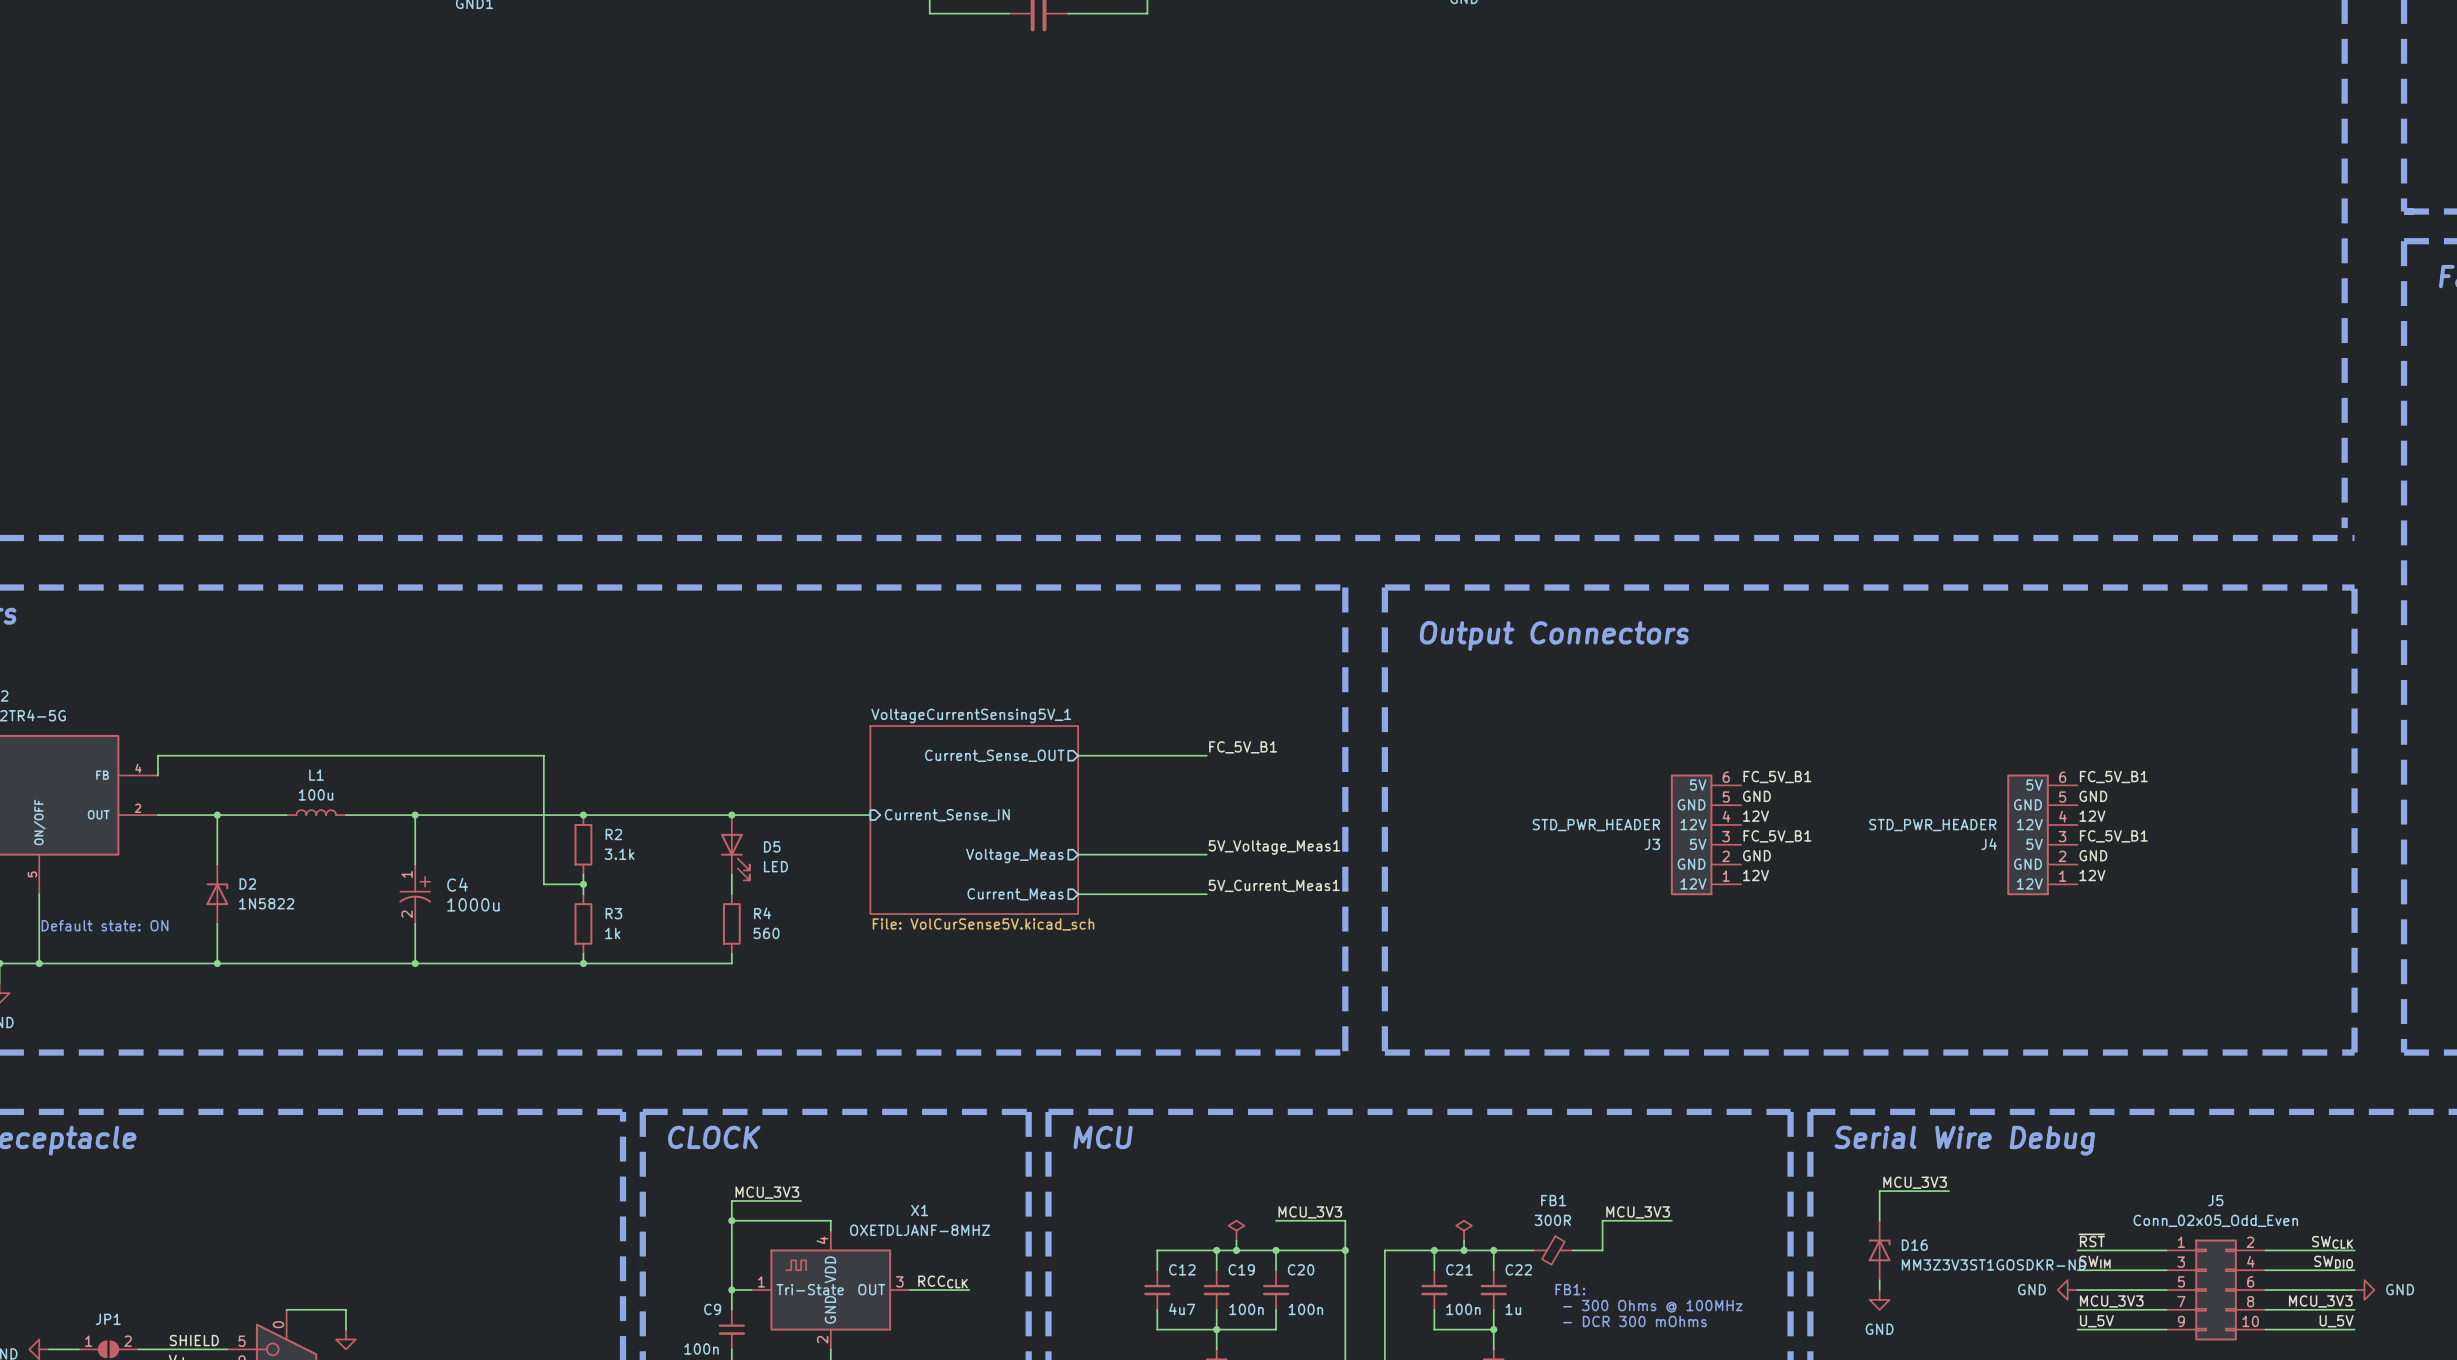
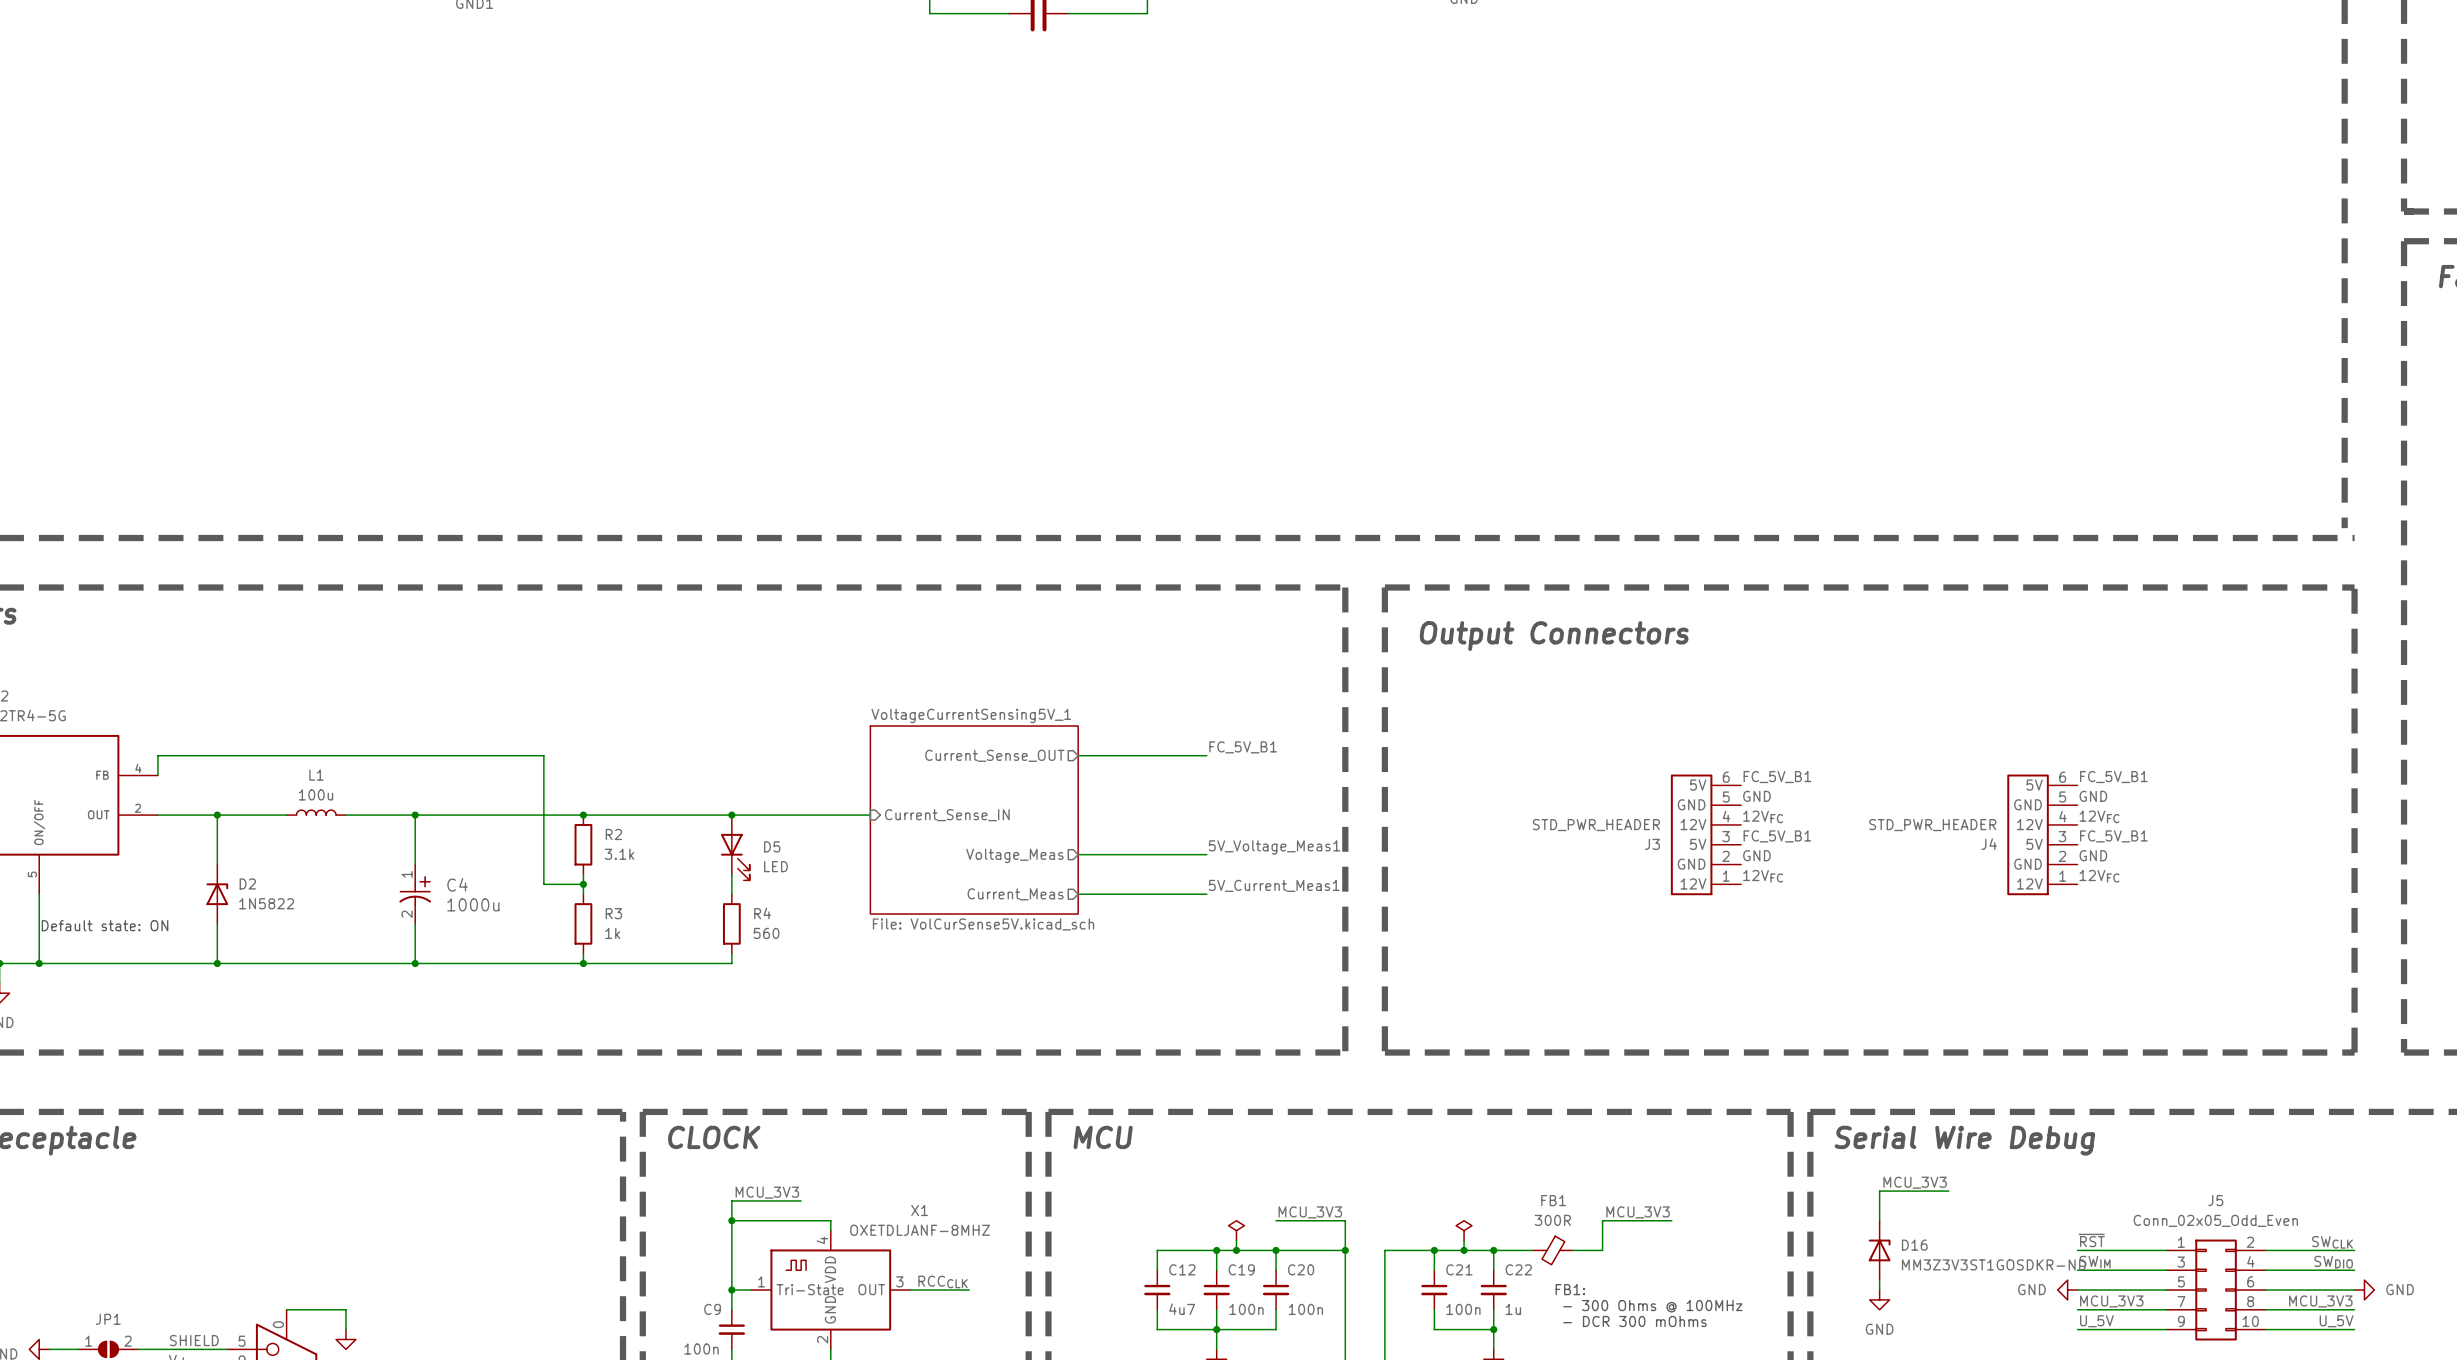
label: 12V (1756, 816) -> 12VFC (1763, 816)
label: 12V (2092, 816) -> 12VFC (2099, 816)
label: 12V (1756, 875) -> 12VFC (1763, 876)
label: 12V (2092, 875) -> 12VFC (2099, 876)

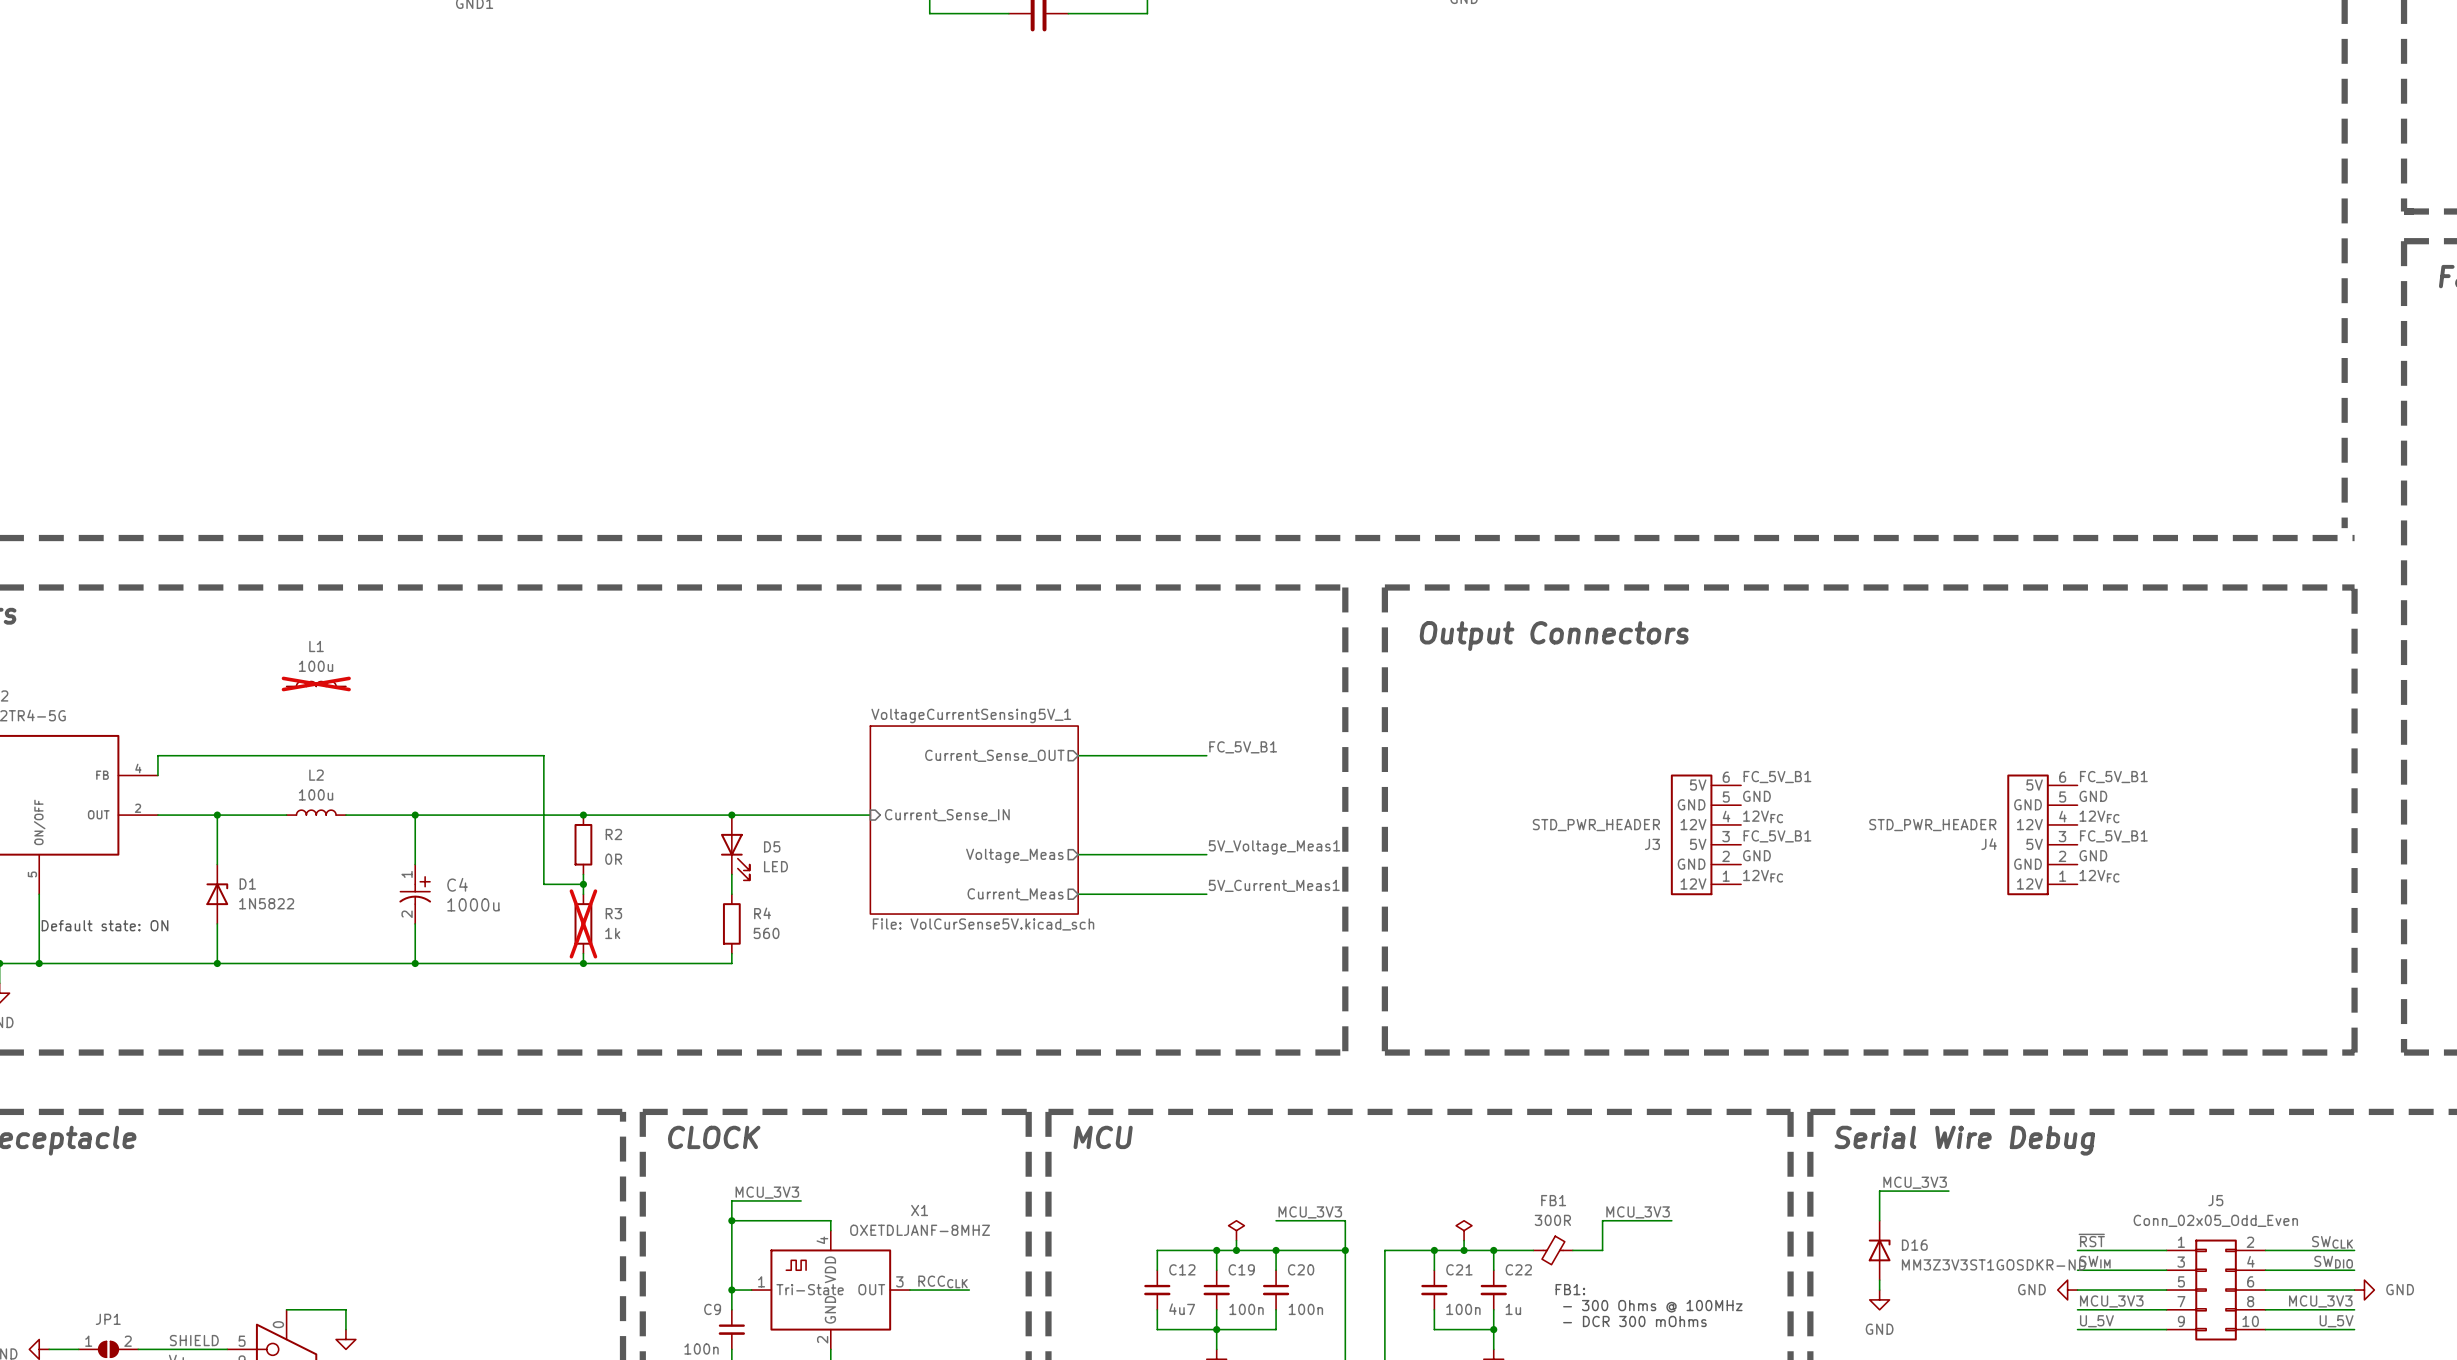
L1: none -> 100u (316, 683)
L1 name: L1 (316, 775) -> L2 (316, 775)
R2 value: 3.1k (619, 854) -> 0R (613, 859)
D2 name: D2 (247, 883) -> D1 (247, 883)
R3 do-not-place cross: none -> (583, 923)

